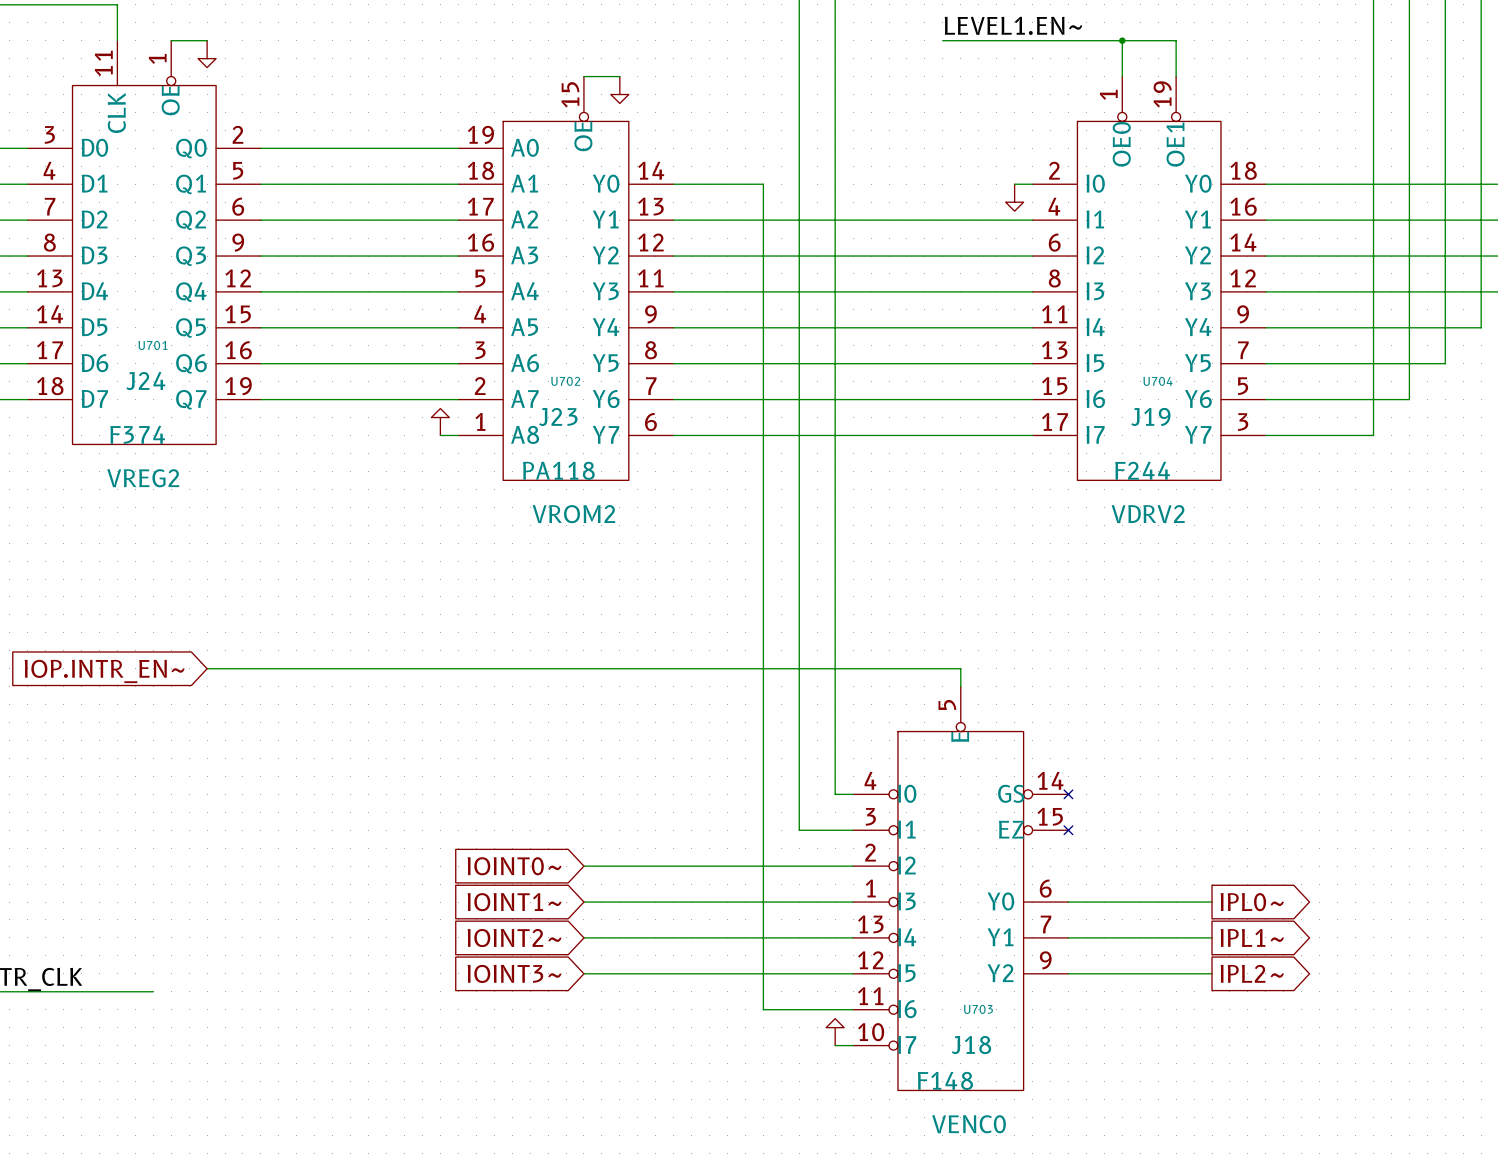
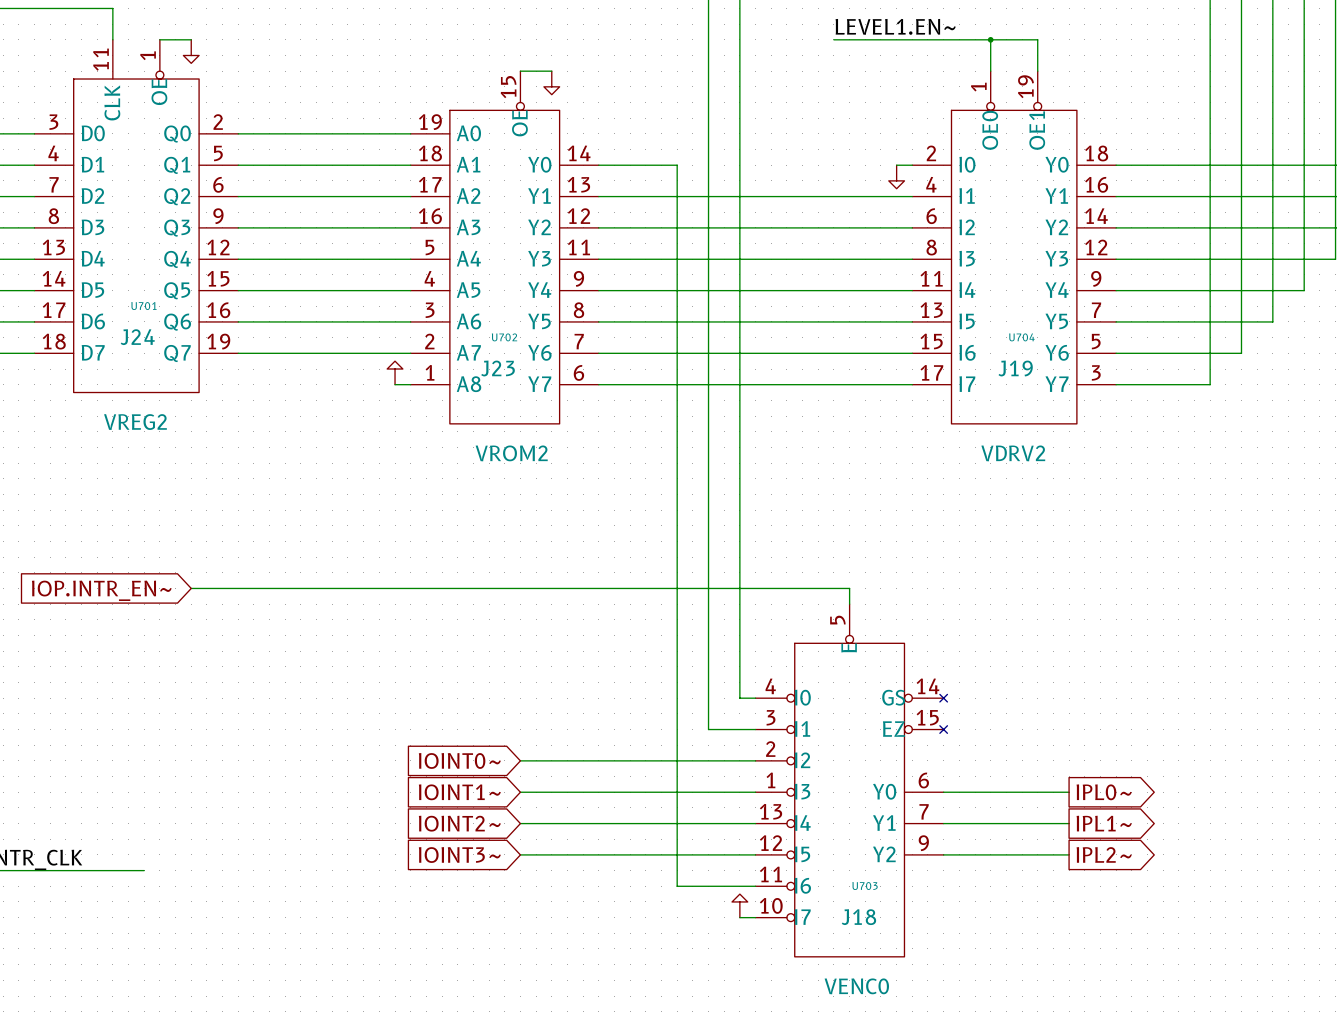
U701 value: F374 (137, 434) -> none
U702 value: PA118 (558, 470) -> none
U704 value: F244 (1142, 470) -> none
U703 value: F148 (945, 1080) -> none

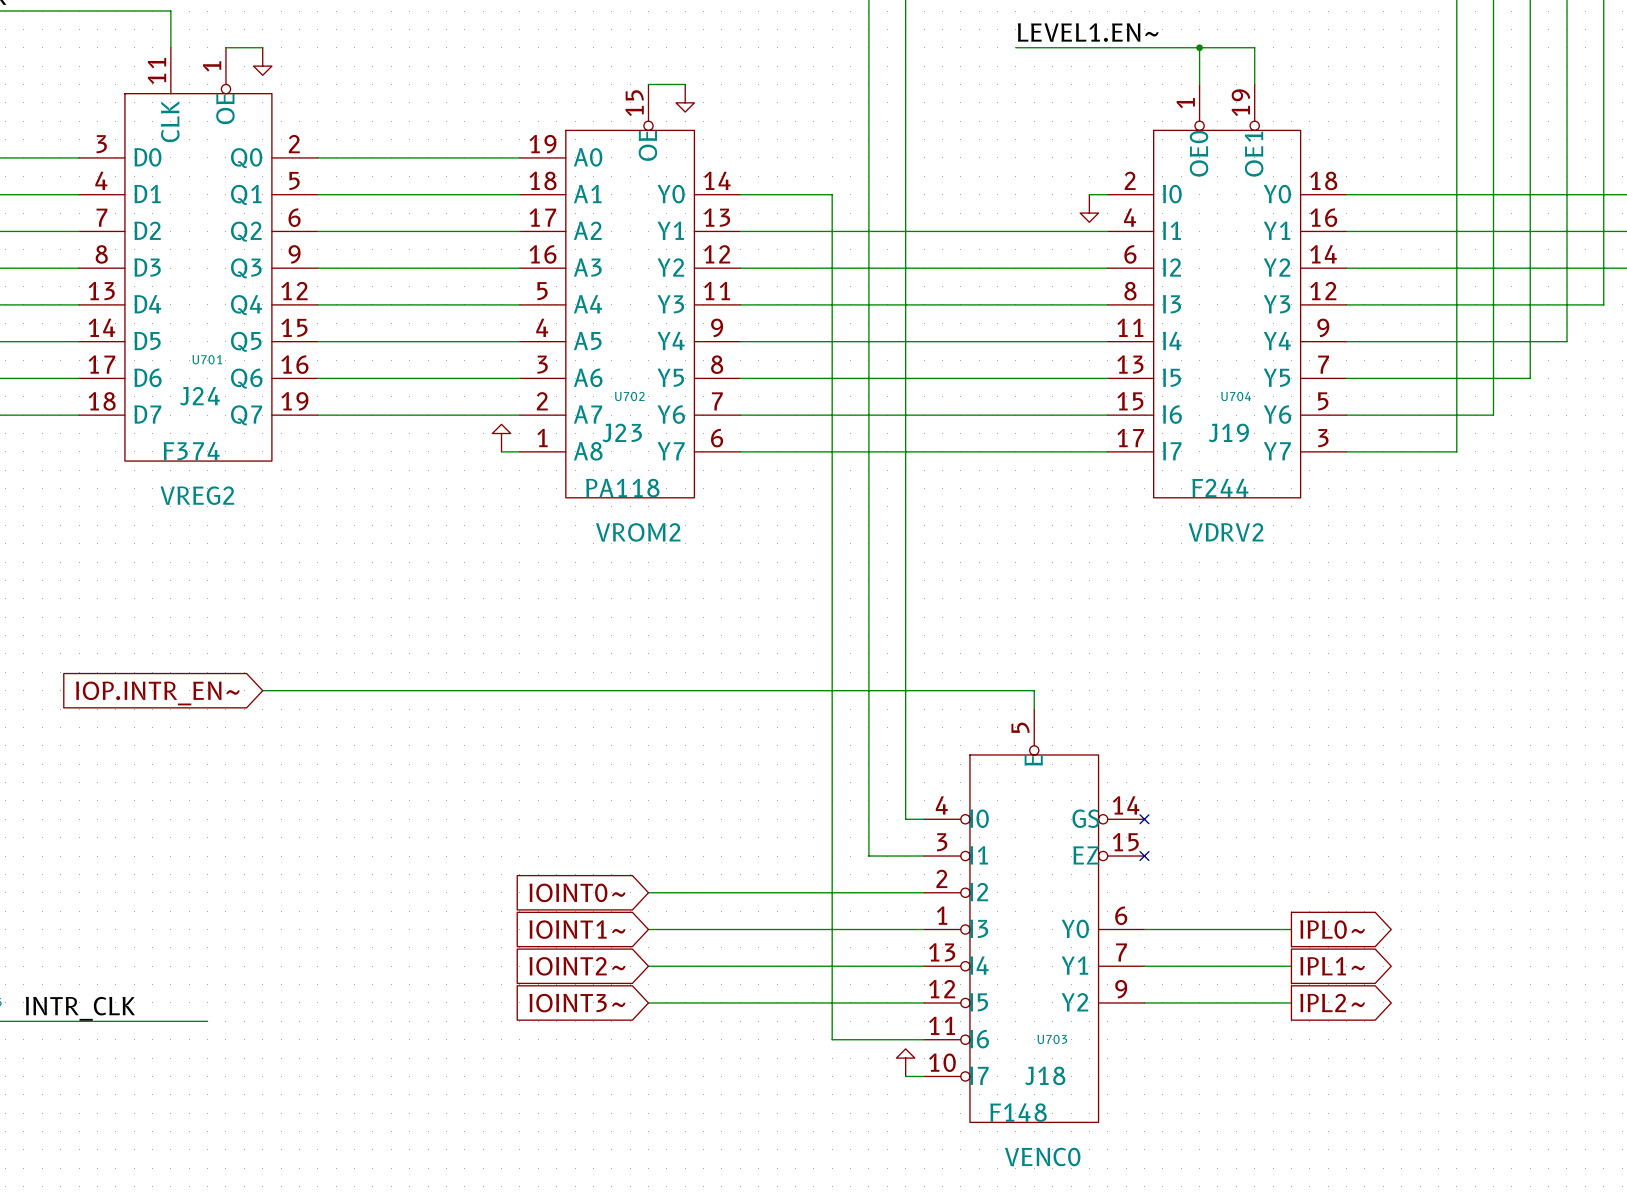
U701 value: none -> F374 (191, 451)
U702 value: none -> PA118 (622, 488)
U704 value: none -> F244 (1220, 487)
U703 value: none -> F148 (1018, 1112)

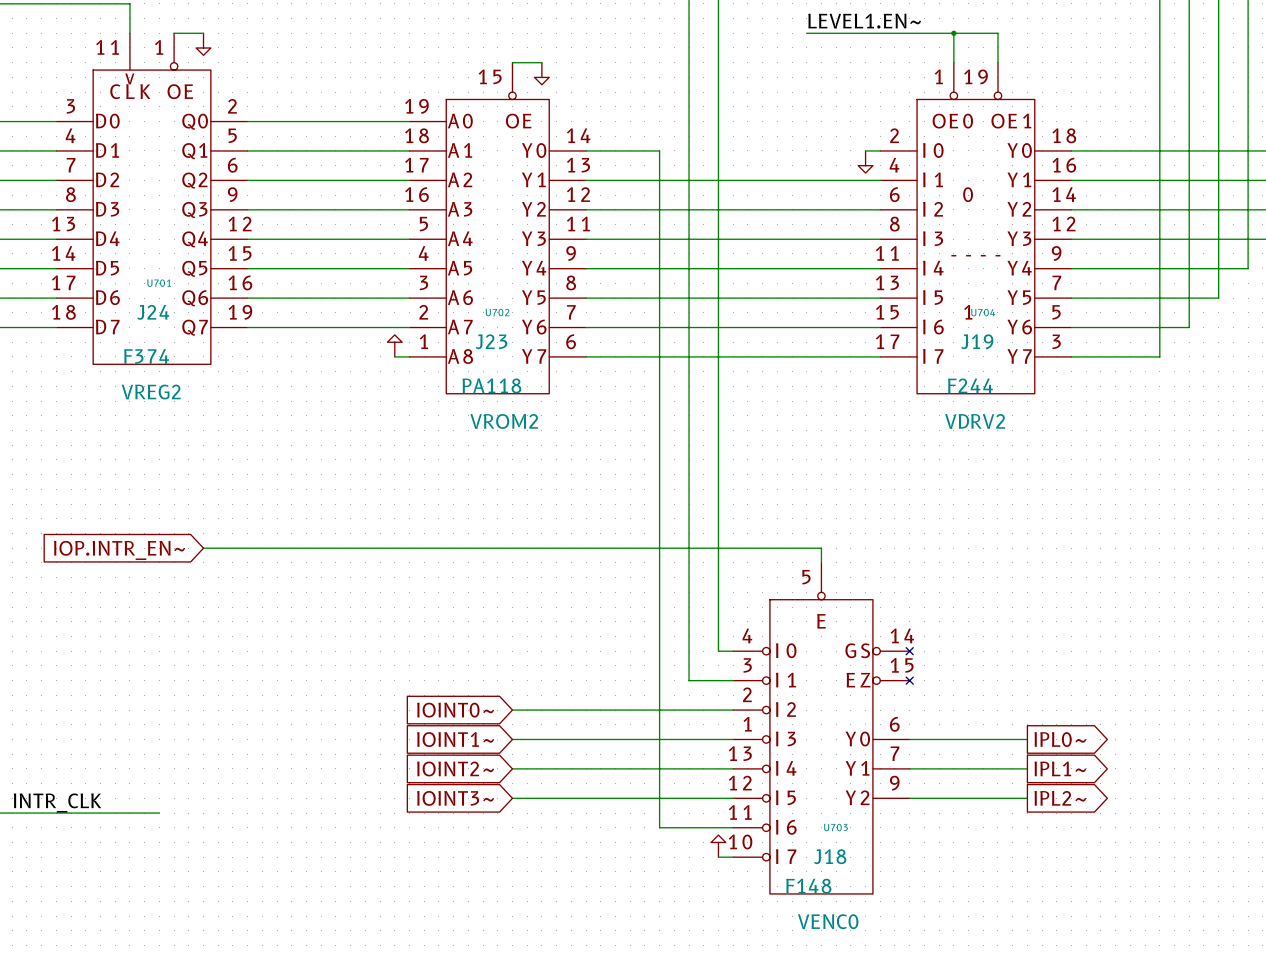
U701 symbol: [79, 47, 318, 462] -> [56, 33, 248, 365]
U702 symbol: [519, 84, 741, 498] -> [409, 62, 587, 394]
U704 symbol: [1107, 84, 1347, 498] -> [880, 62, 1072, 394]
U703 symbol: [924, 709, 1145, 1123] -> [733, 562, 910, 894]

